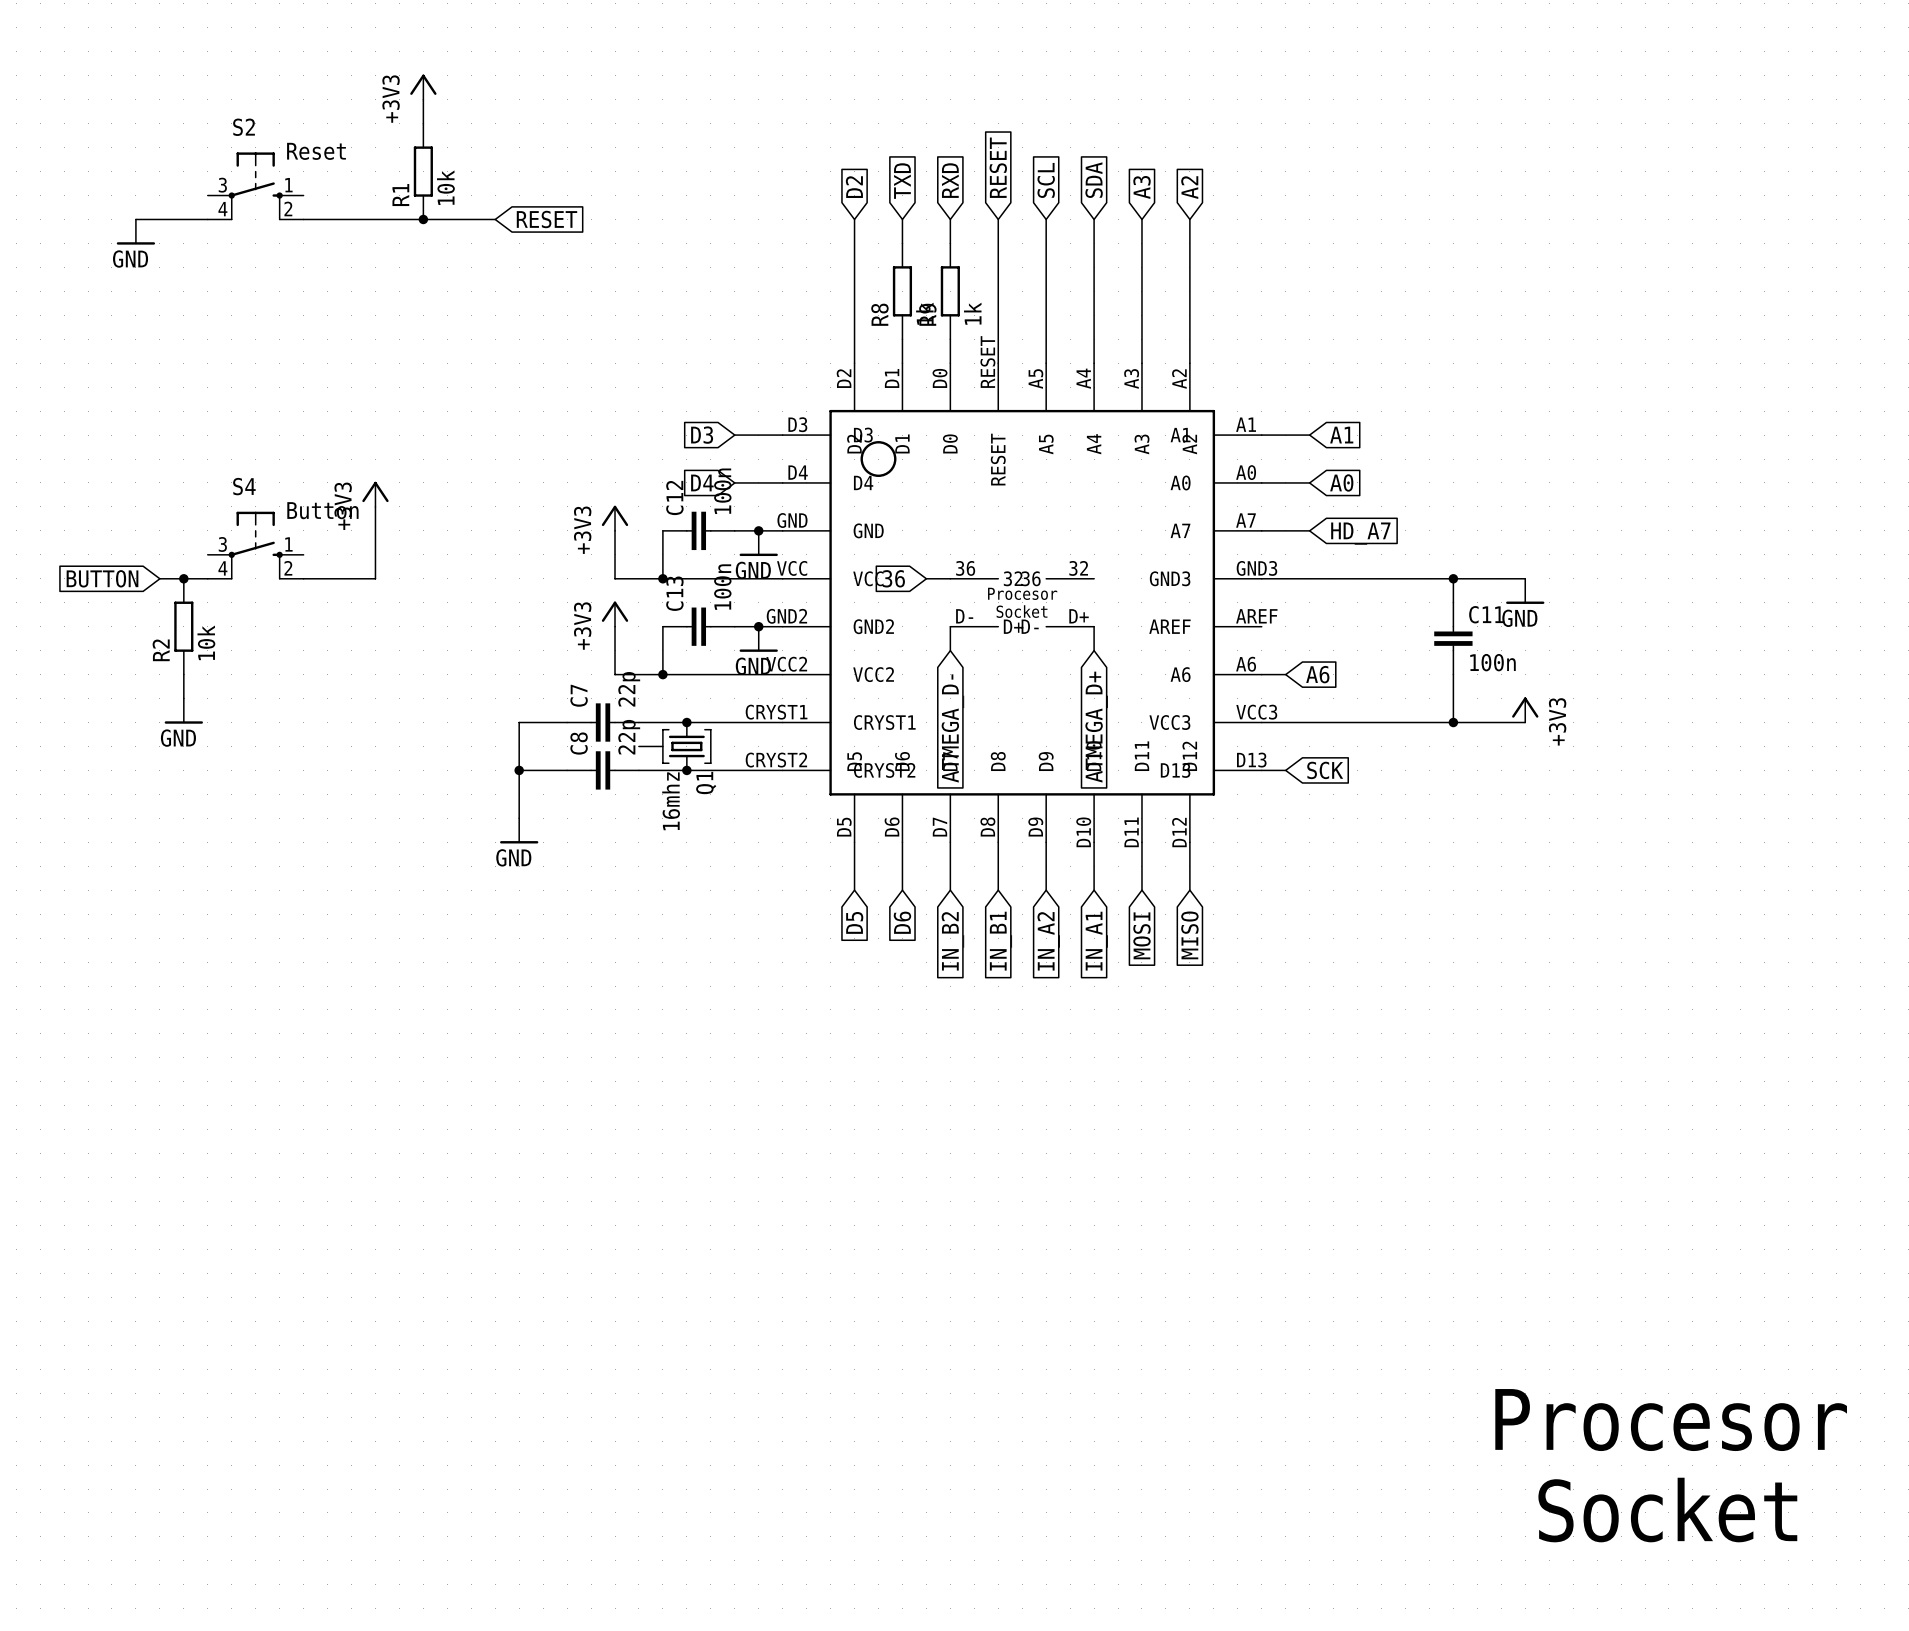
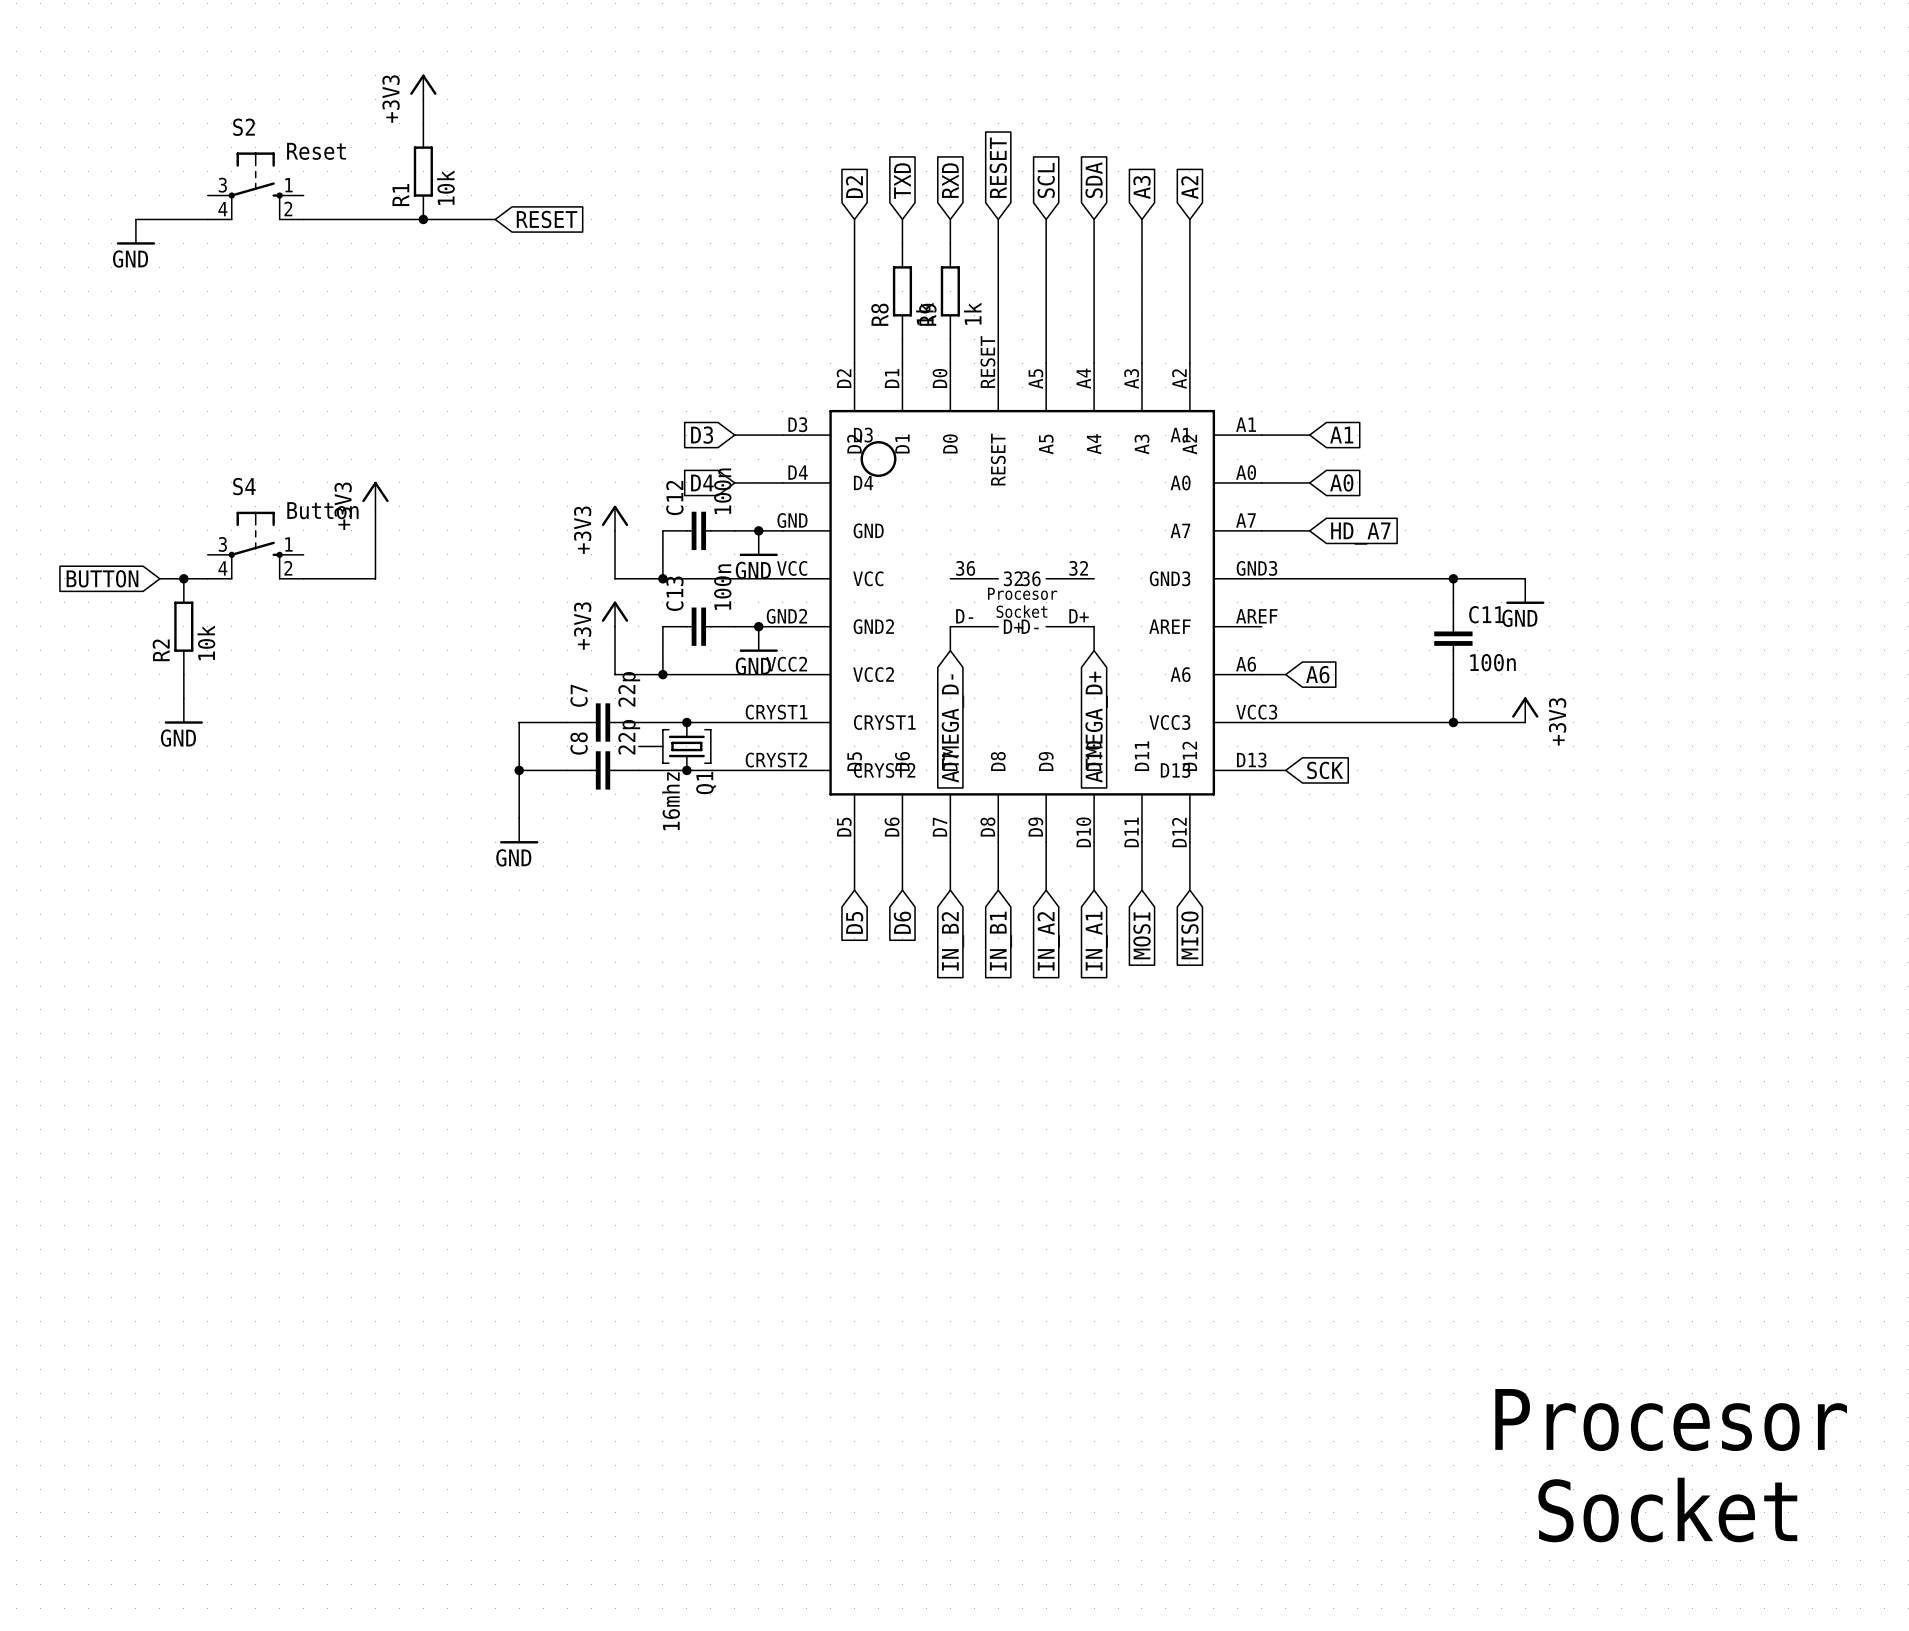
global label: 36 (893, 578) -> none
wire: (926, 578) (950, 578) -> none

